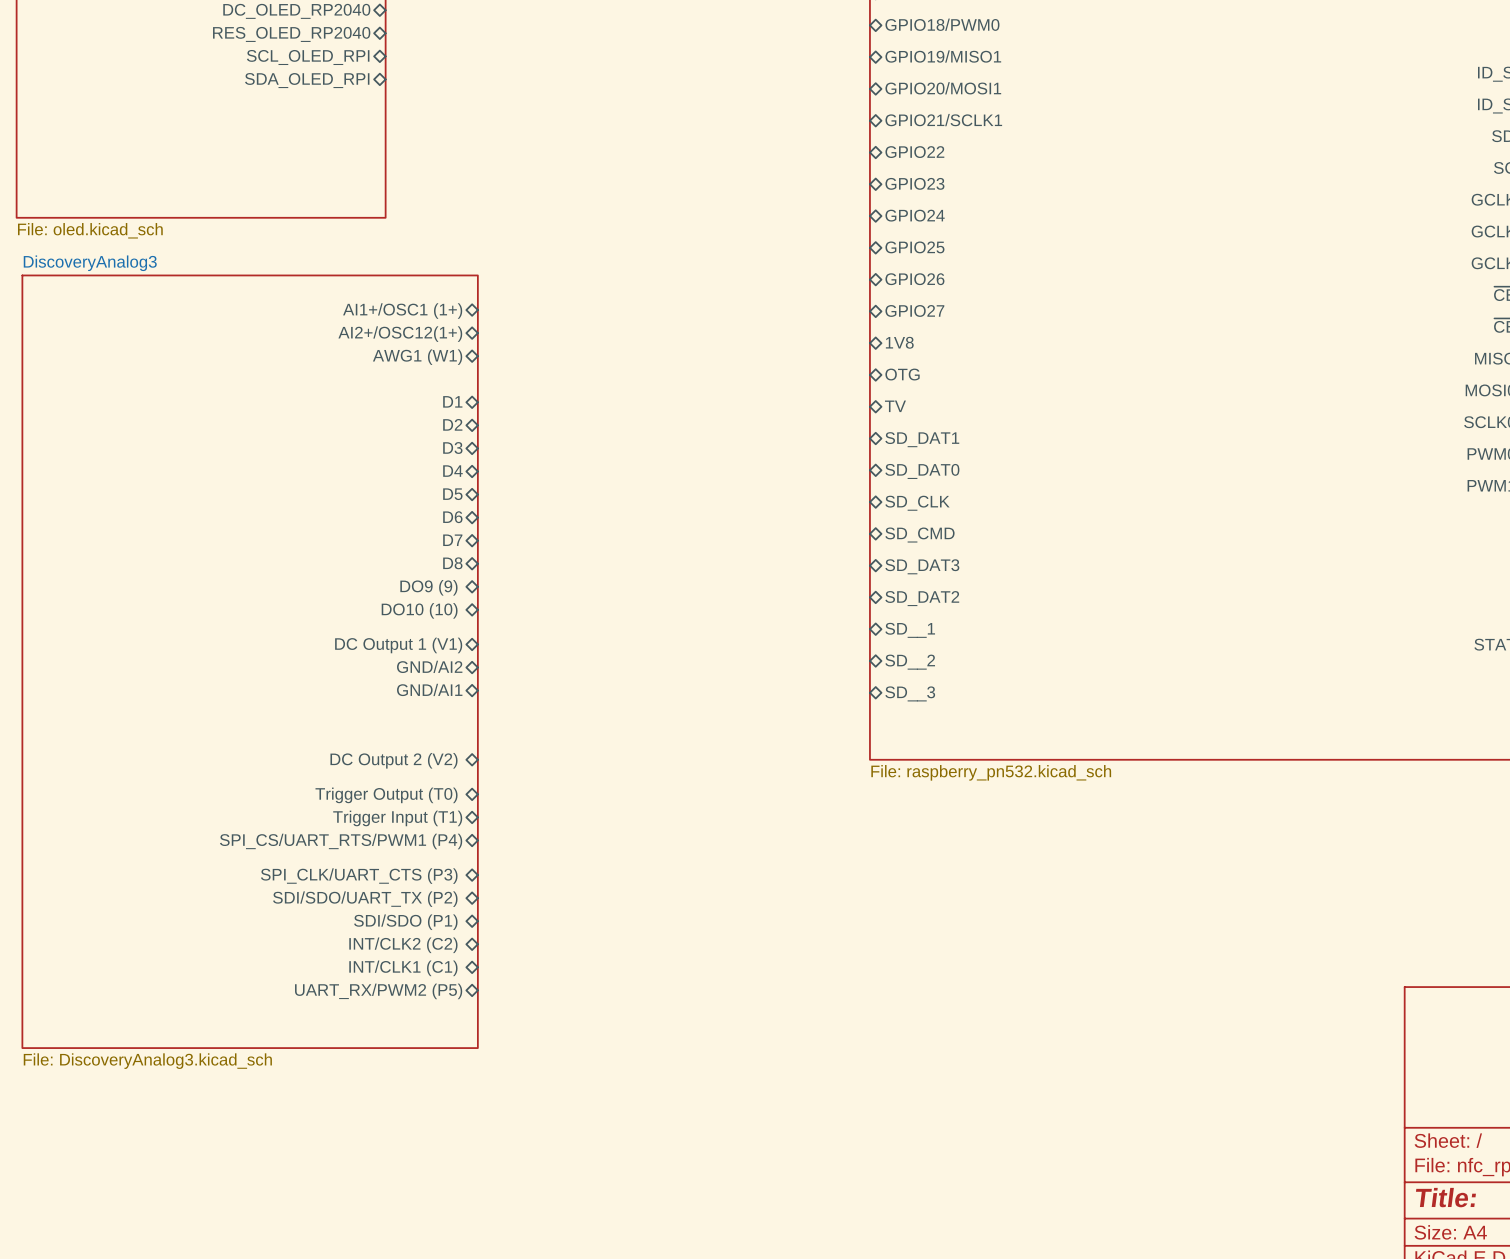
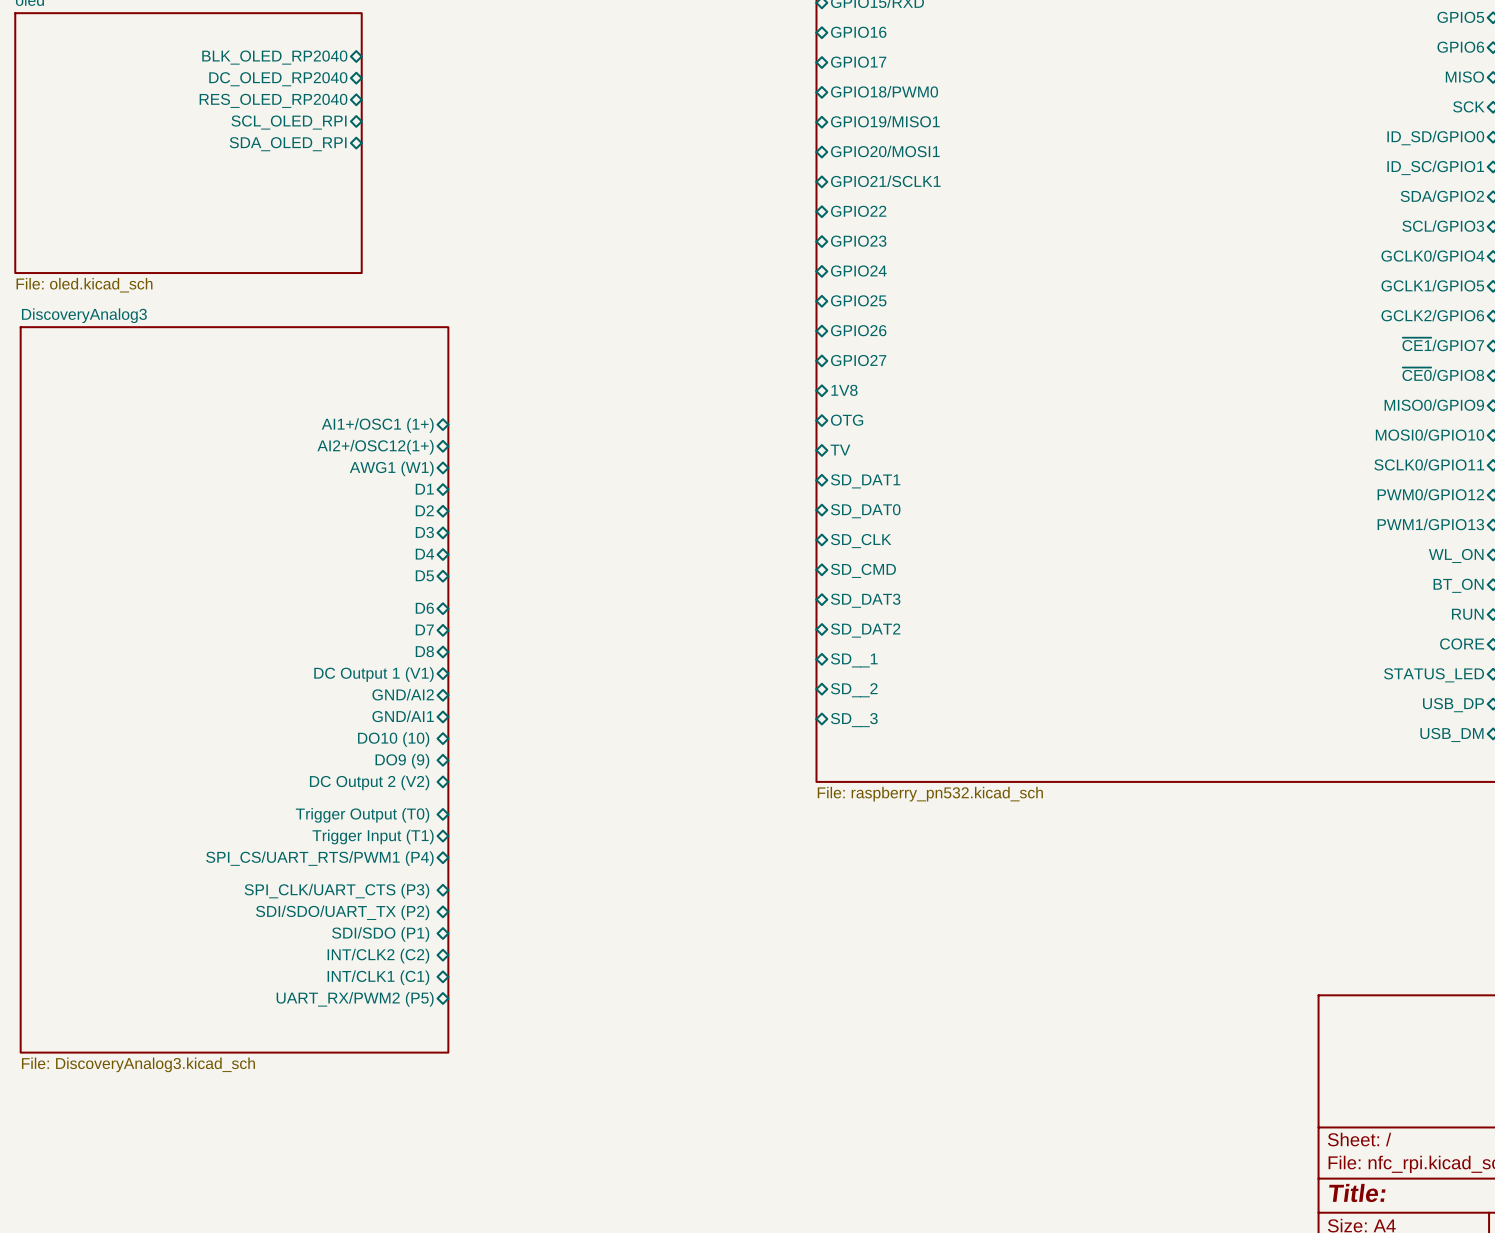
sheet pin position: AI1+/OSC1 (1+) (402, 311) -> AI1+/OSC1 (1+) (377, 425)
sheet pin: AI2+/OSC12(1+) (400, 334) -> none
sheet pin: AWG1 (W1) (417, 357) -> none
sheet pin: D1 (452, 401) -> AI2+/OSC12(1+) (375, 447)
sheet pin: D2 (452, 424) -> AWG1 (W1) (391, 468)
sheet pin: D3 (452, 447) -> D1 (424, 489)
sheet pin: D4 (452, 471) -> D2 (424, 510)
sheet pin: D5 (452, 494) -> D3 (424, 532)
sheet pin: D6 (452, 517) -> D4 (424, 554)
sheet pin: D7 (452, 540) -> D5 (424, 575)
sheet pin position: D8 (452, 563) -> D8 (424, 651)
sheet pin: none -> D6 (424, 608)
sheet pin position: DO9 (9) (428, 587) -> DO9 (9) (402, 761)
sheet pin: none -> D7 (424, 629)
sheet pin position: DO10 (10) (419, 610) -> DO10 (10) (393, 739)

